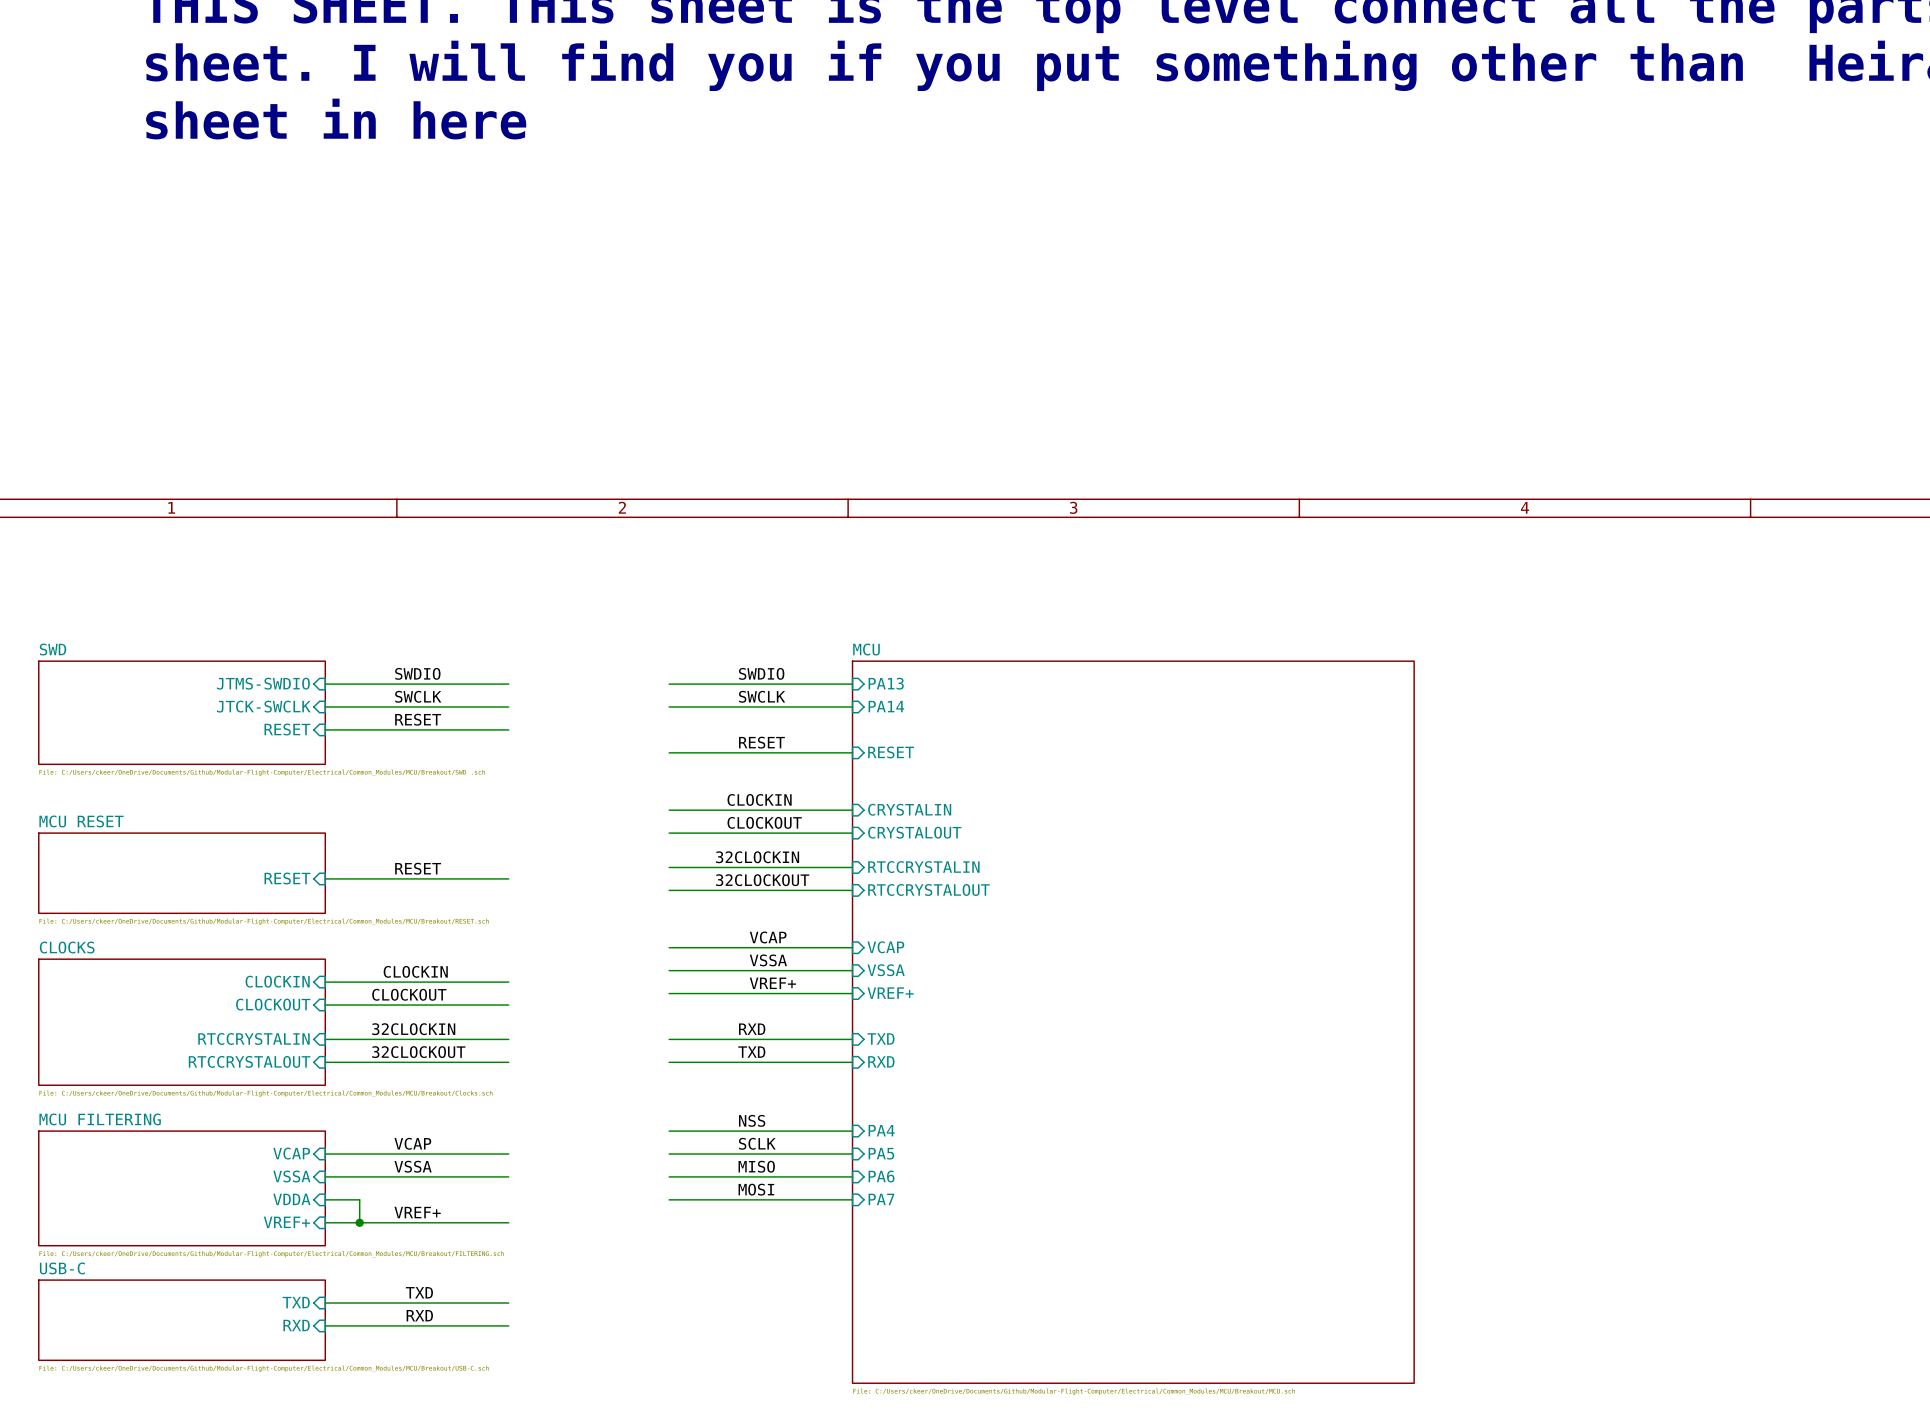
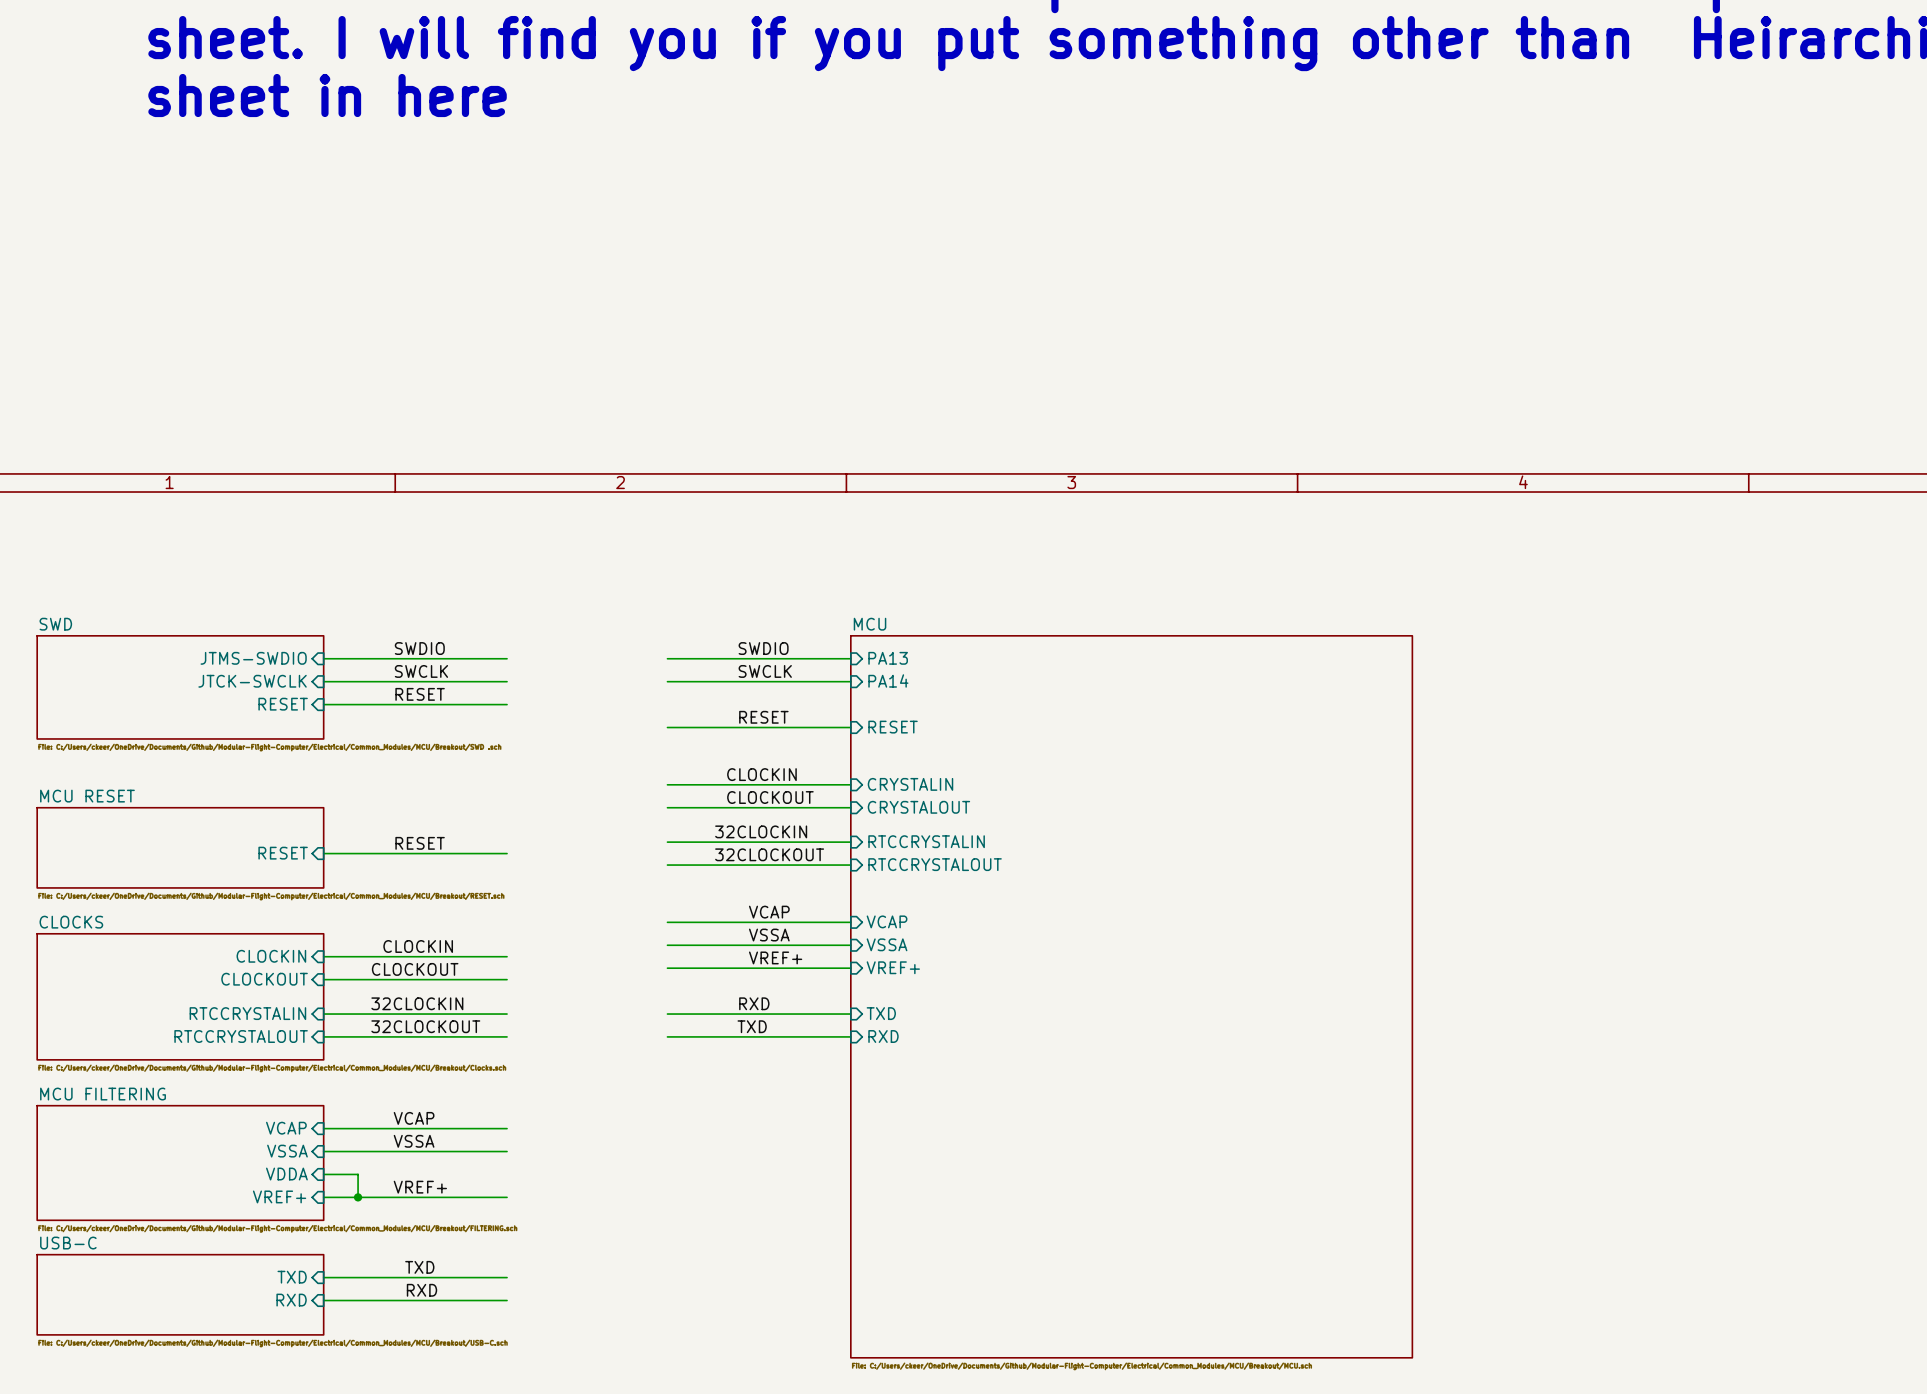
label: NSS (752, 1120) -> none
sheet pin: PA4 (881, 1130) -> none
wire: (669, 1131) (852, 1131) -> none
label: SCLK (757, 1143) -> none
sheet pin: PA5 (881, 1153) -> none
wire: (669, 1154) (852, 1154) -> none
label: MISO (756, 1166) -> none
wire: (669, 1176) (852, 1176) -> none
sheet pin: PA6 (881, 1176) -> none
label: MOSI (756, 1189) -> none
wire: (669, 1199) (852, 1199) -> none
sheet pin: PA7 (881, 1199) -> none

